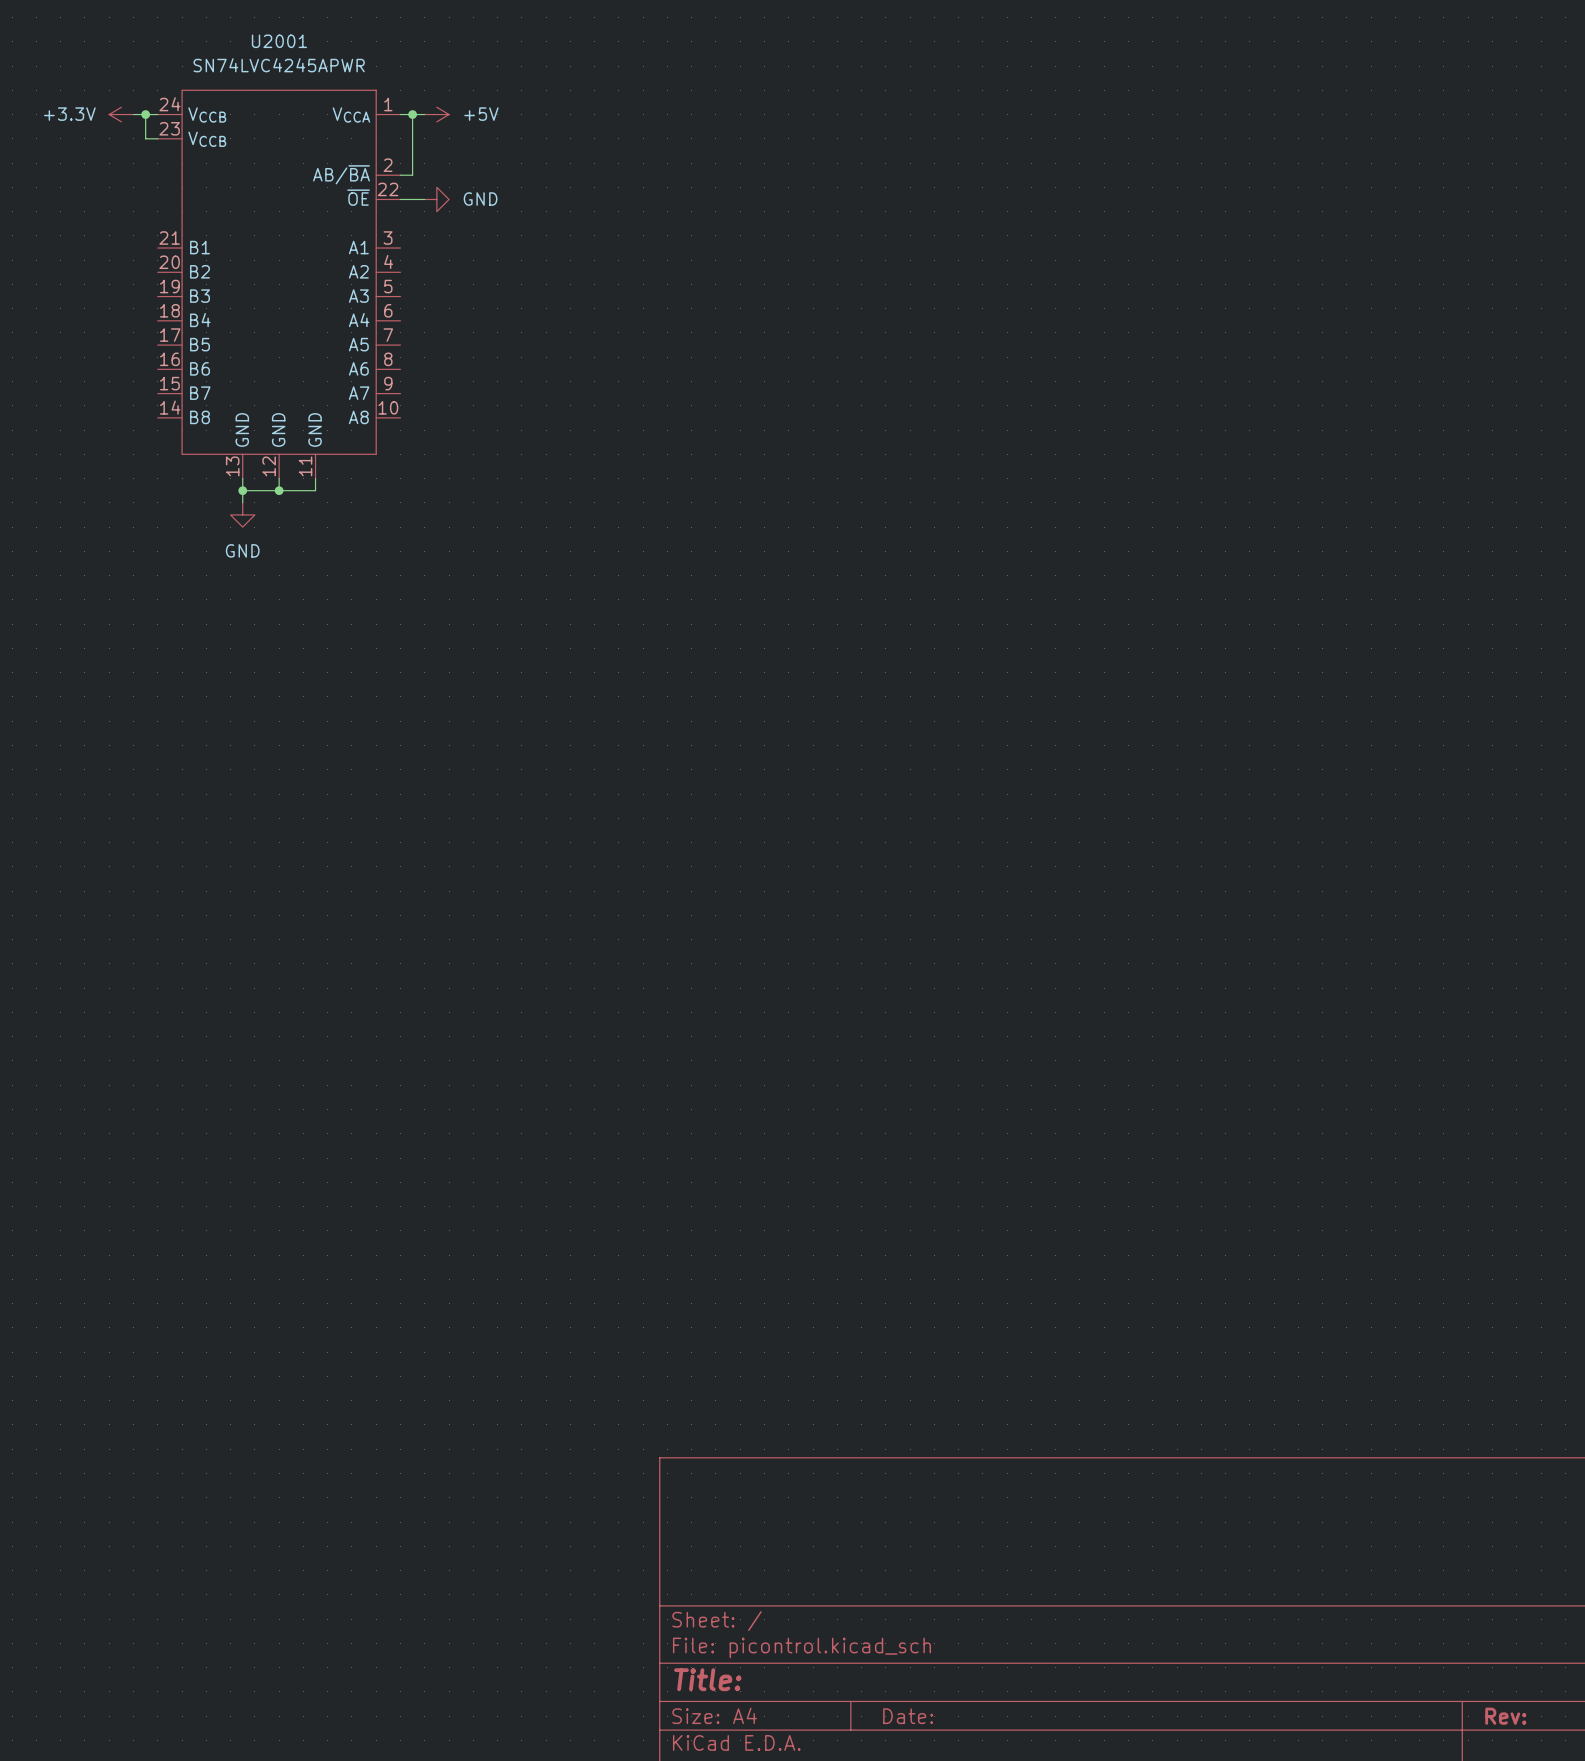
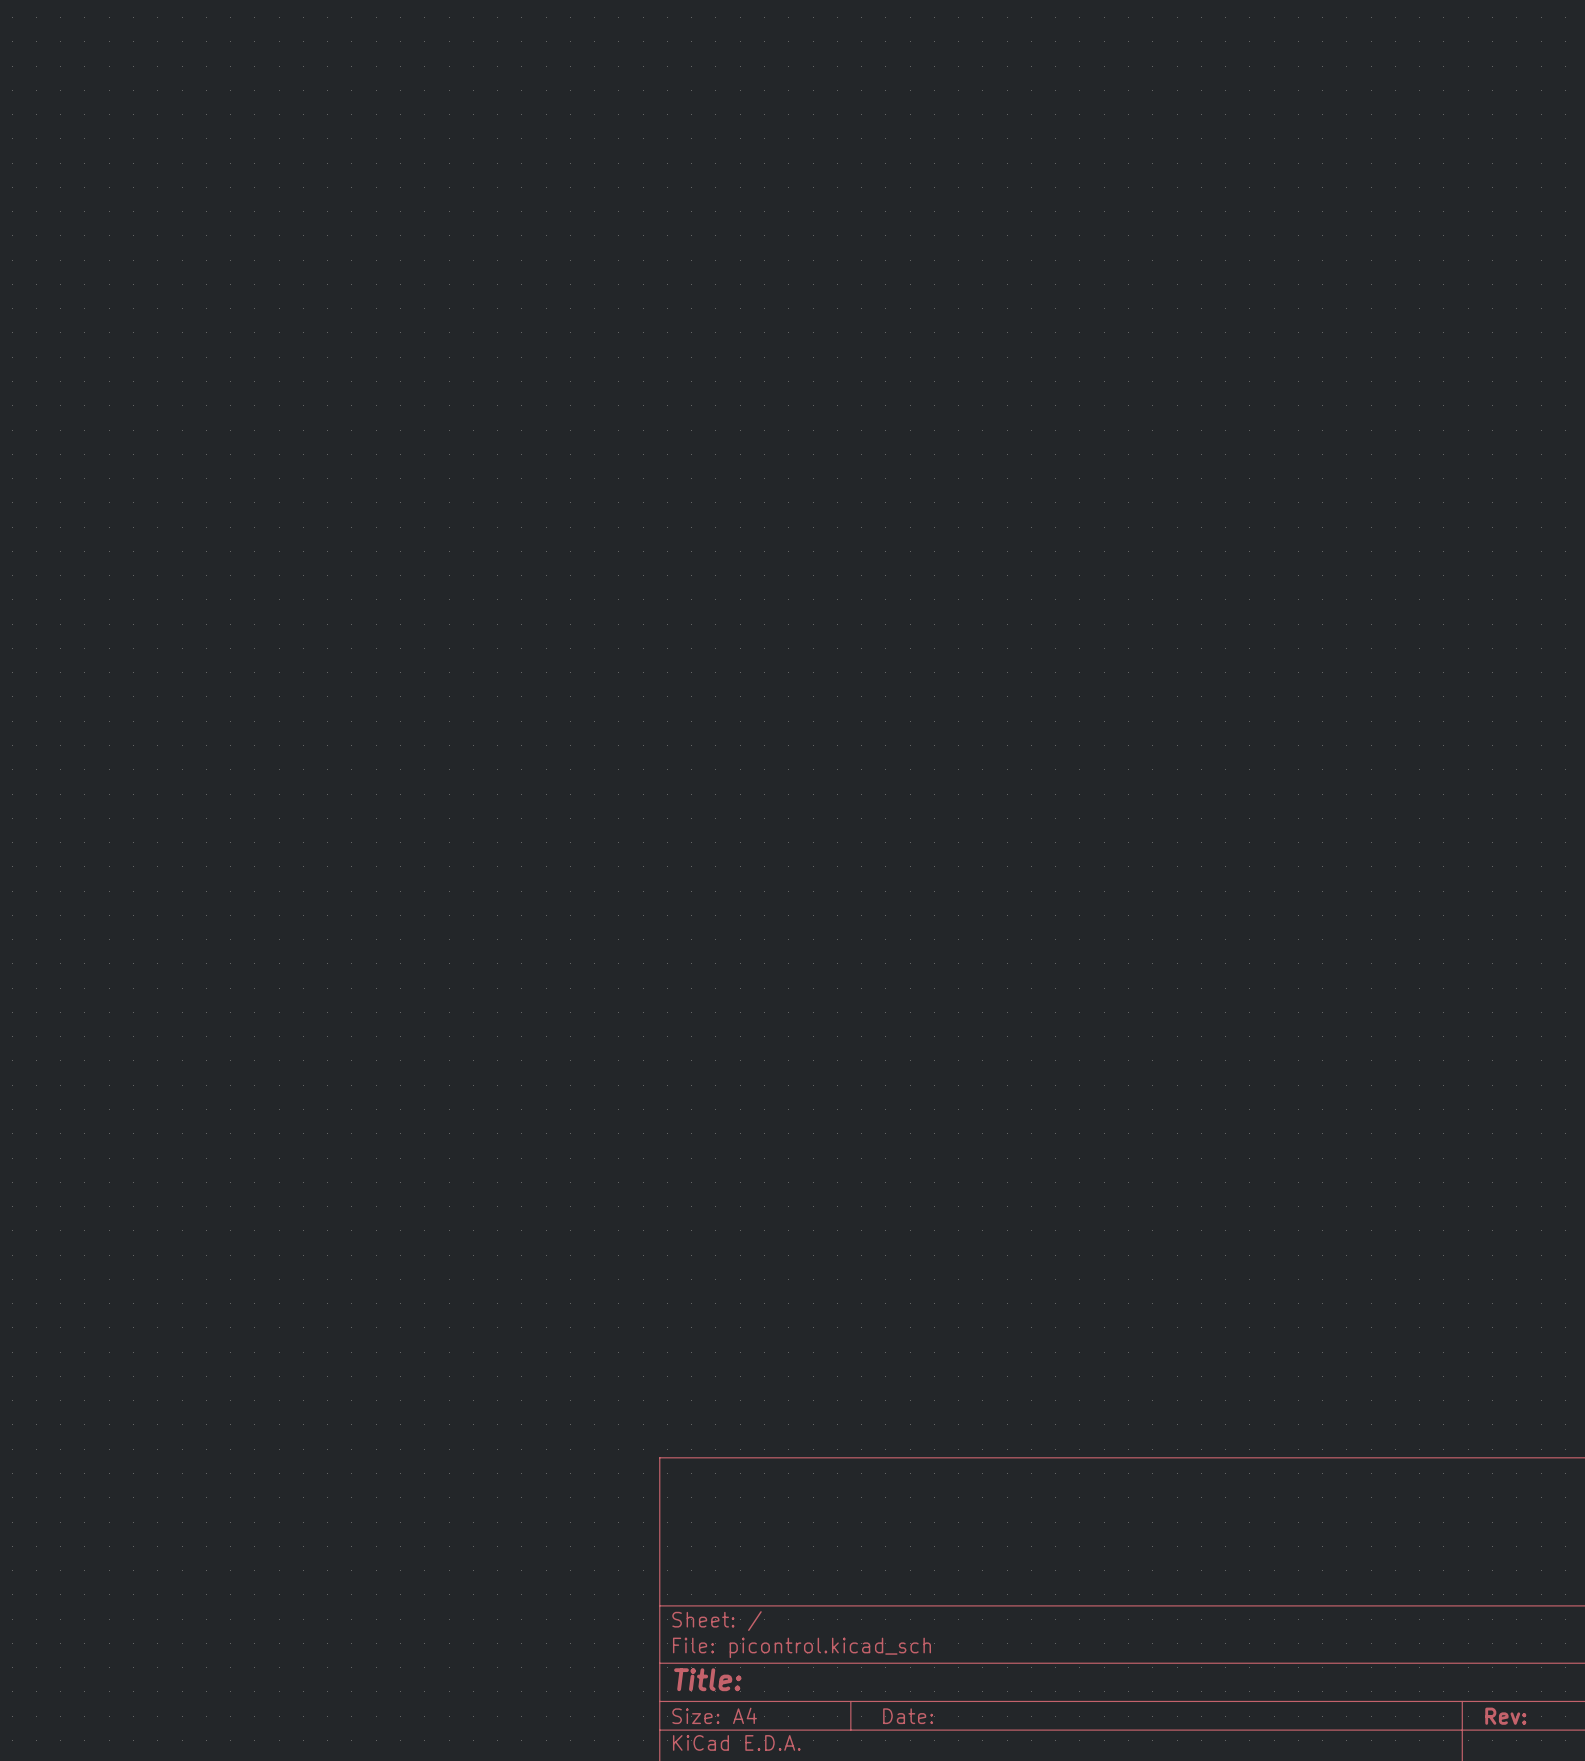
power symbol: +3.3V (121, 114) -> none
wire: (133, 114) (157, 114) -> none
wire: (145, 114) (145, 138) (157, 138) -> none
junction: (145, 114) -> none
wire: (400, 114) (424, 114) -> none
wire: (412, 114) (412, 175) (400, 175) -> none
junction: (412, 114) -> none
power symbol: +5V (436, 114) -> none
wire: (400, 199) (424, 199) -> none
power symbol: GND (436, 199) -> none
U2001: SN74LVC4245APWR (279, 284) -> none
wire: (242, 478) (242, 502) -> none
wire: (279, 478) (279, 490) -> none
wire: (315, 478) (315, 490) (242, 490) -> none
junction: (242, 490) -> none
junction: (279, 490) -> none
power symbol: GND (242, 514) -> none

